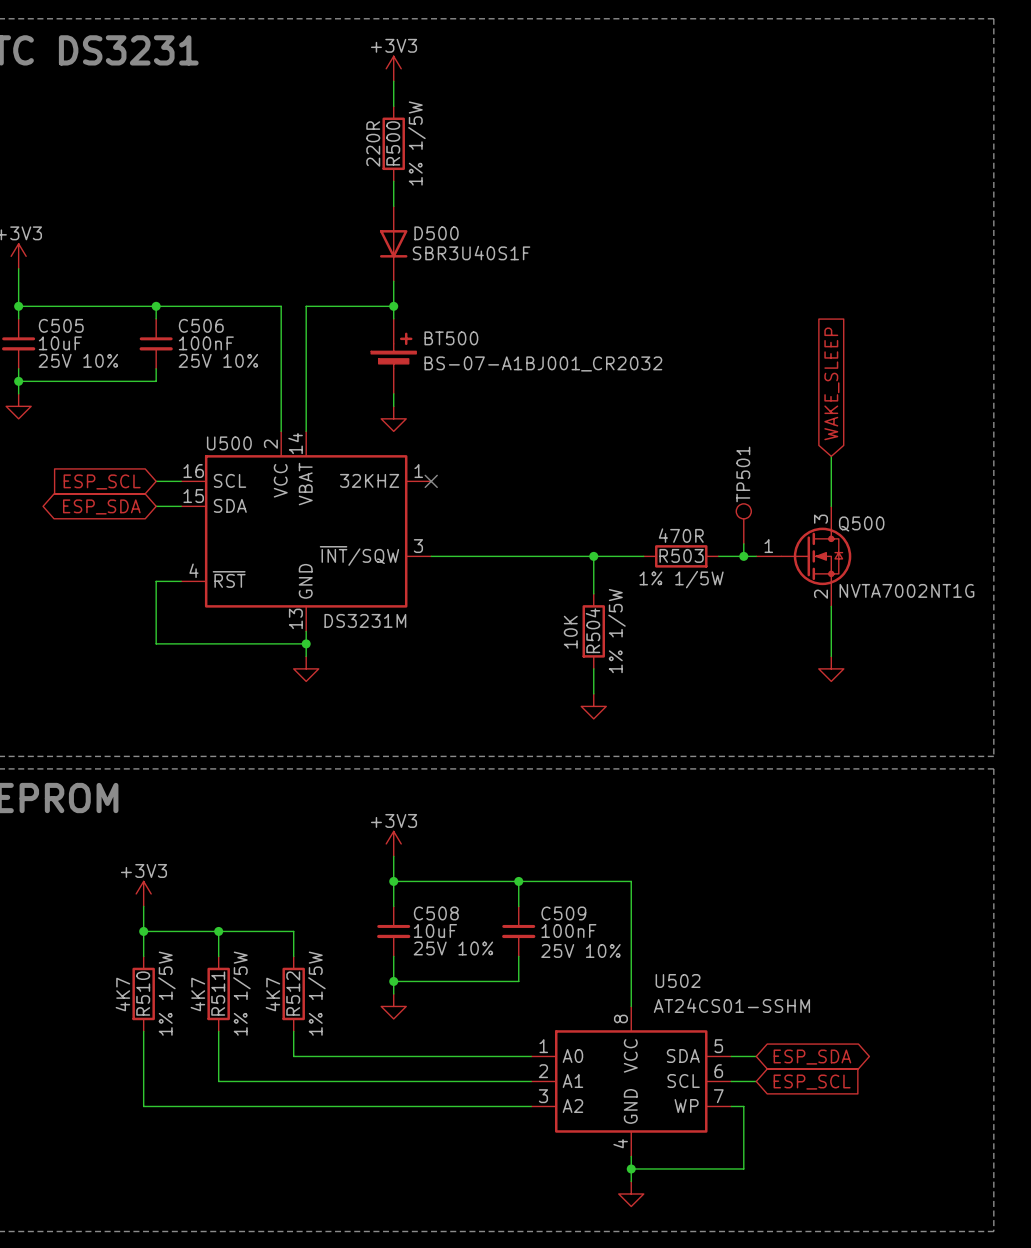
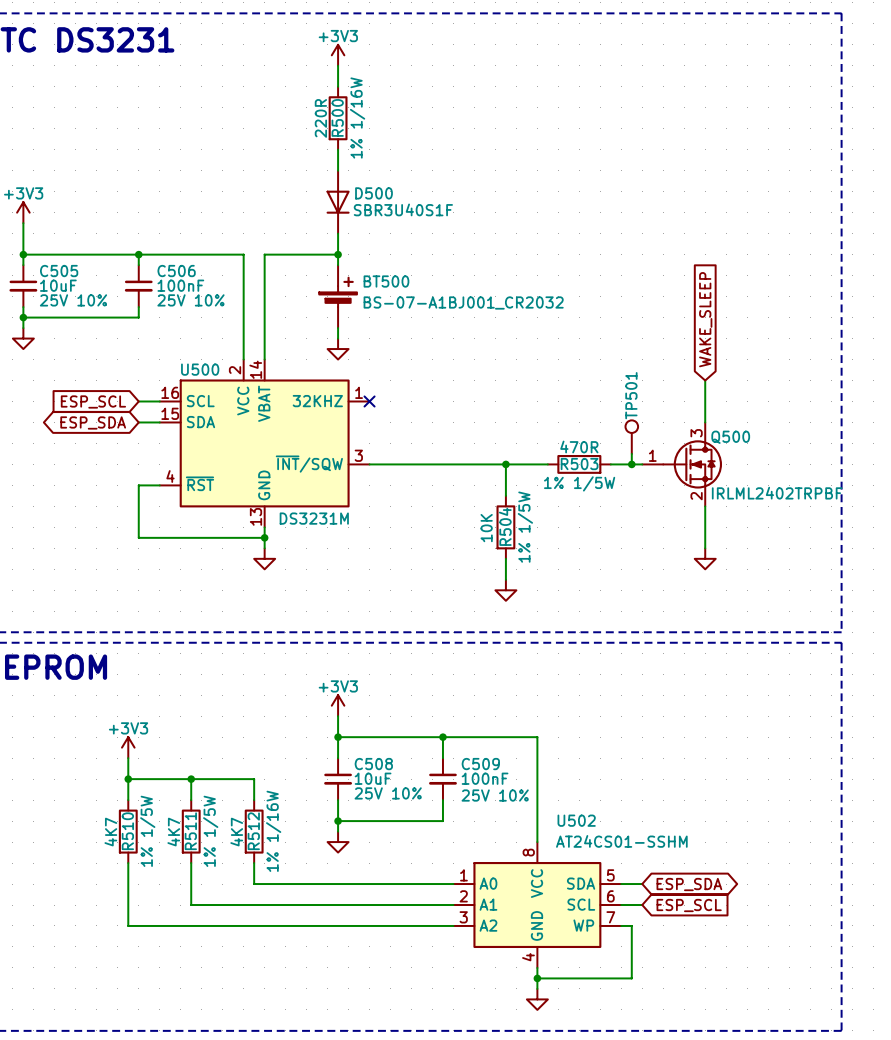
R500 text: 1% 1/5W (416, 143) -> 1% 1/16W (357, 118)
Q500 value: NVTA7002NT1G (906, 590) -> IRLML2402TRPBF (777, 493)
R512 text: 1% 1/5W (316, 993) -> 1% 1/16W (273, 831)

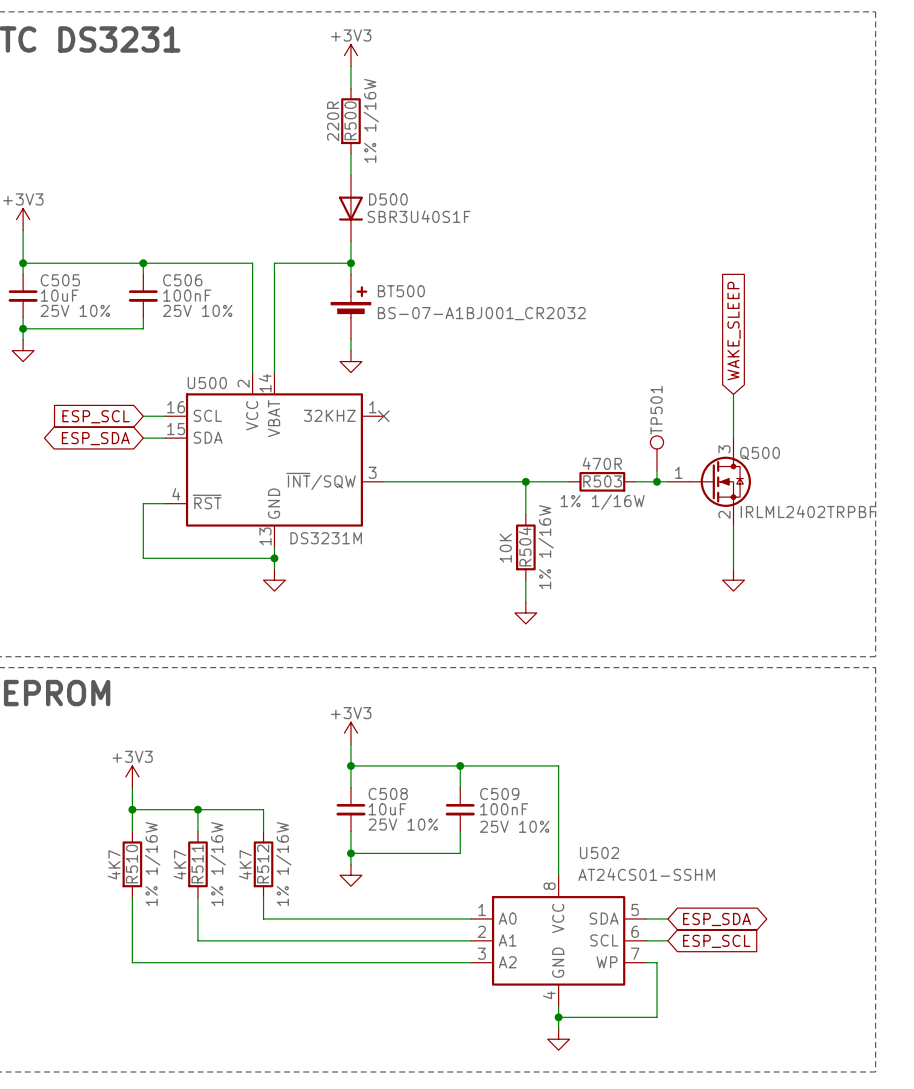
R503 text: 1% 1/5W (579, 483) -> 1% 1/16W (602, 502)
R504 text: 1% 1/5W (525, 527) -> 1% 1/16W (546, 547)
R510 text: 1% 1/5W (147, 831) -> 1% 1/16W (152, 864)
R511 text: 1% 1/5W (210, 831) -> 1% 1/16W (218, 864)

